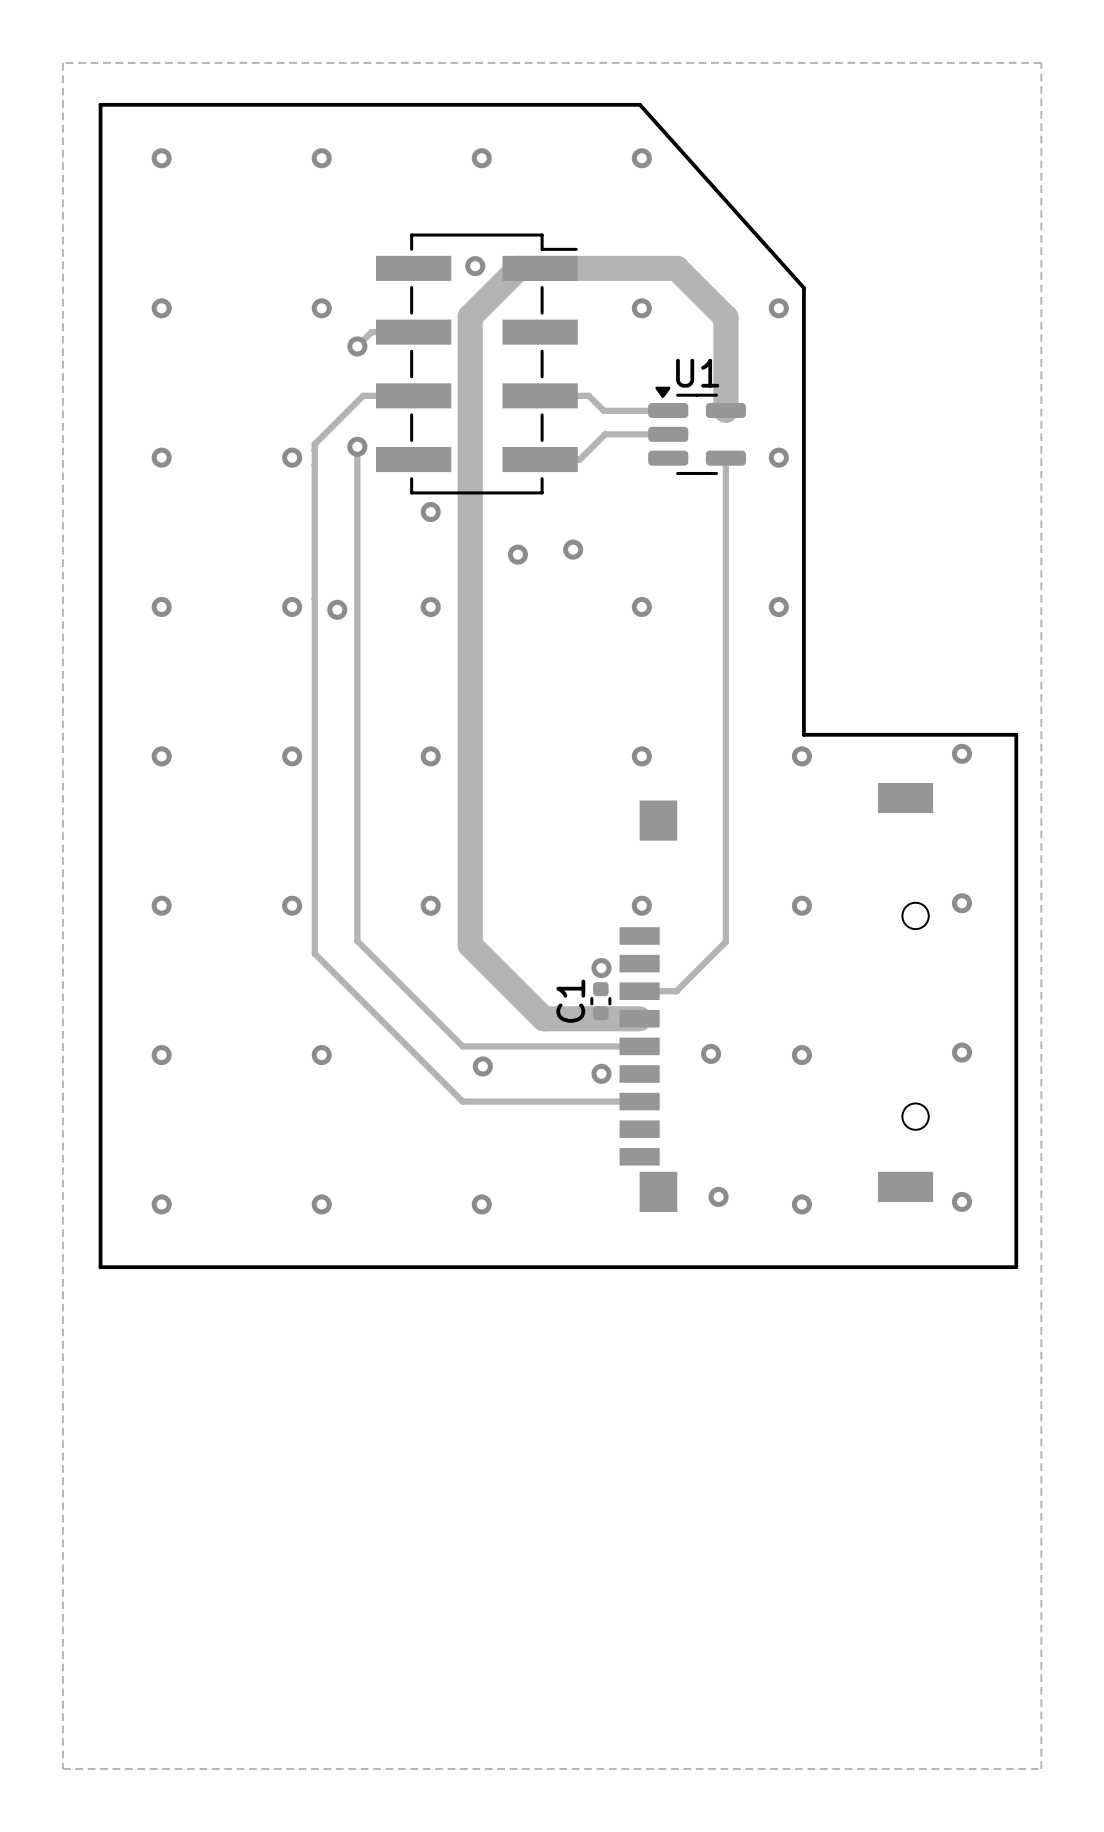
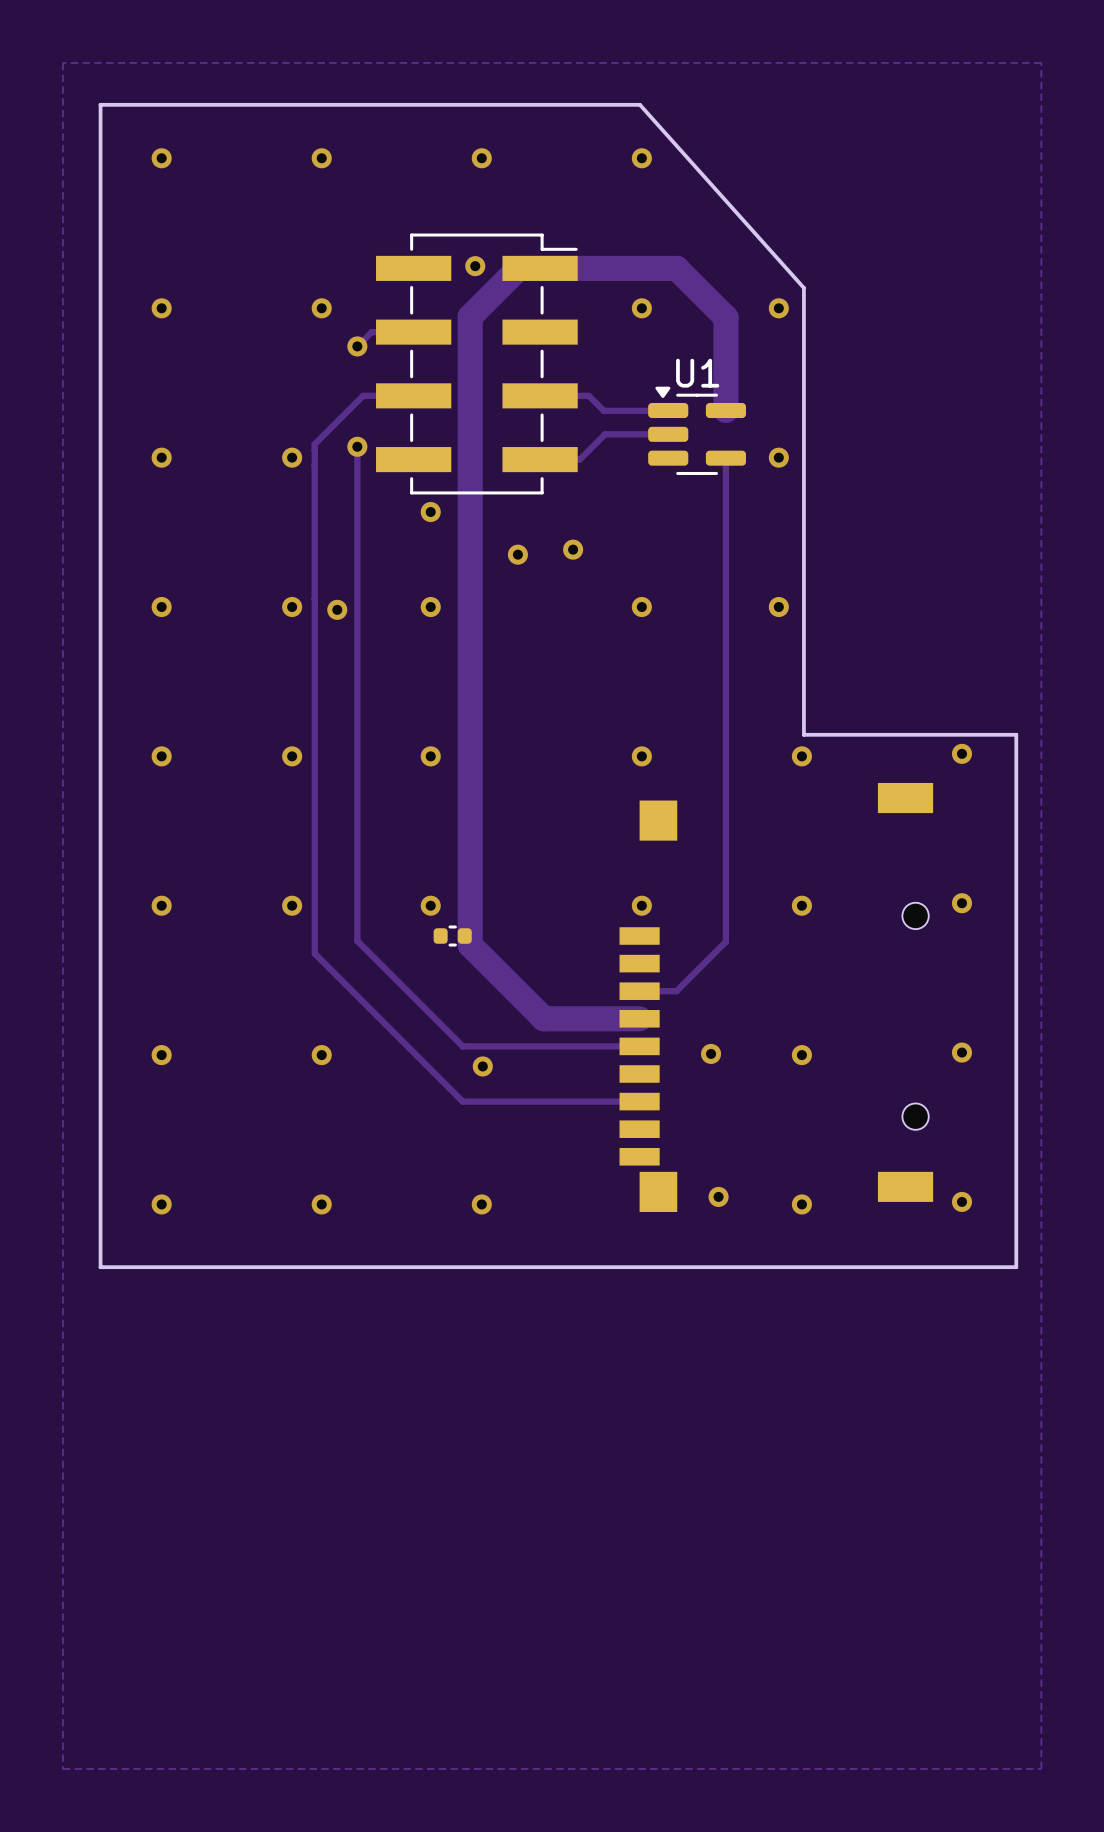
part: none -> (452, 936)
via: (601, 968) -> none
C1: (600, 1001) -> none
via: (601, 1073) -> none

